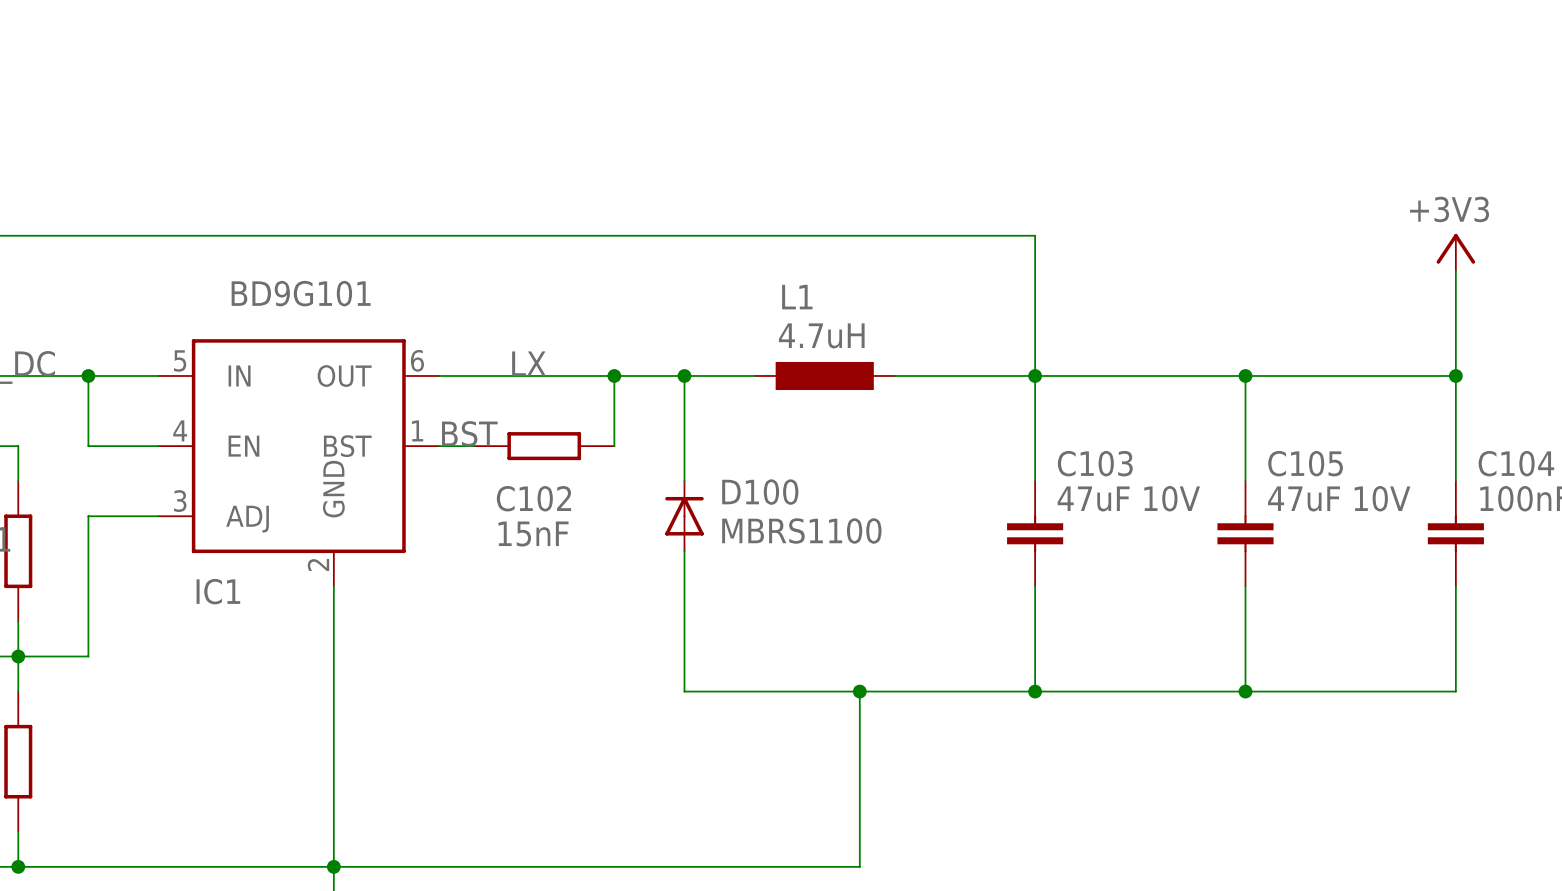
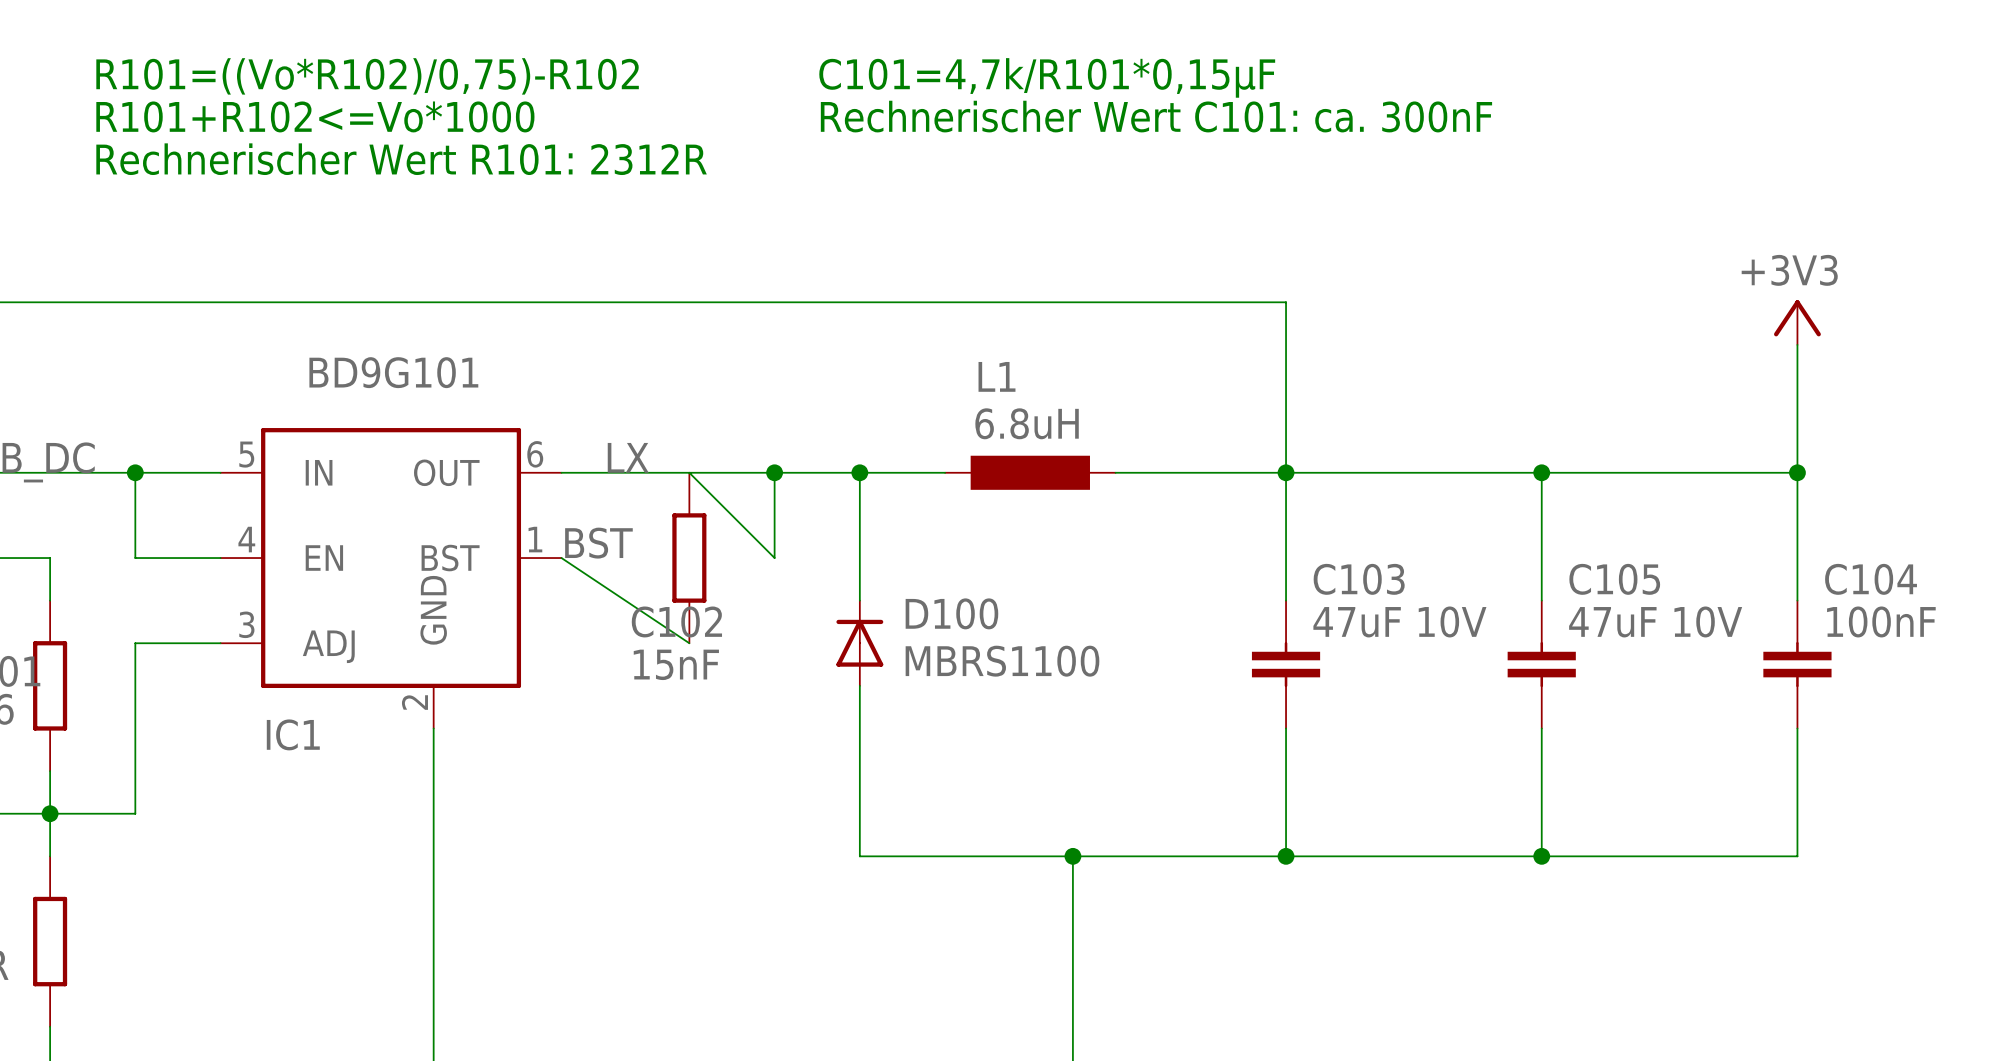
text: none -> R101=((Vo*R102)/0,75)-R102 (367, 76)
text: none -> C101=4,7k/R101*0,15µF (1047, 77)
text: none -> Rechnerischer Wert C101: ca. 300nF (1156, 116)
text: none -> R101+R102<=Vo*1000 (315, 116)
text: none -> Rechnerischer Wert R101: 2312R (401, 159)
L1 value: 4.7uH (821, 335) -> 6.8uH (1027, 423)
label position: LX (529, 363) -> LX (628, 457)
wire: none -> (689, 472) (774, 558)
wire: (439, 446) (474, 446) -> (561, 558) (689, 643)
C102 rotation: 0° (544, 446) -> 90° clockwise (689, 558)

